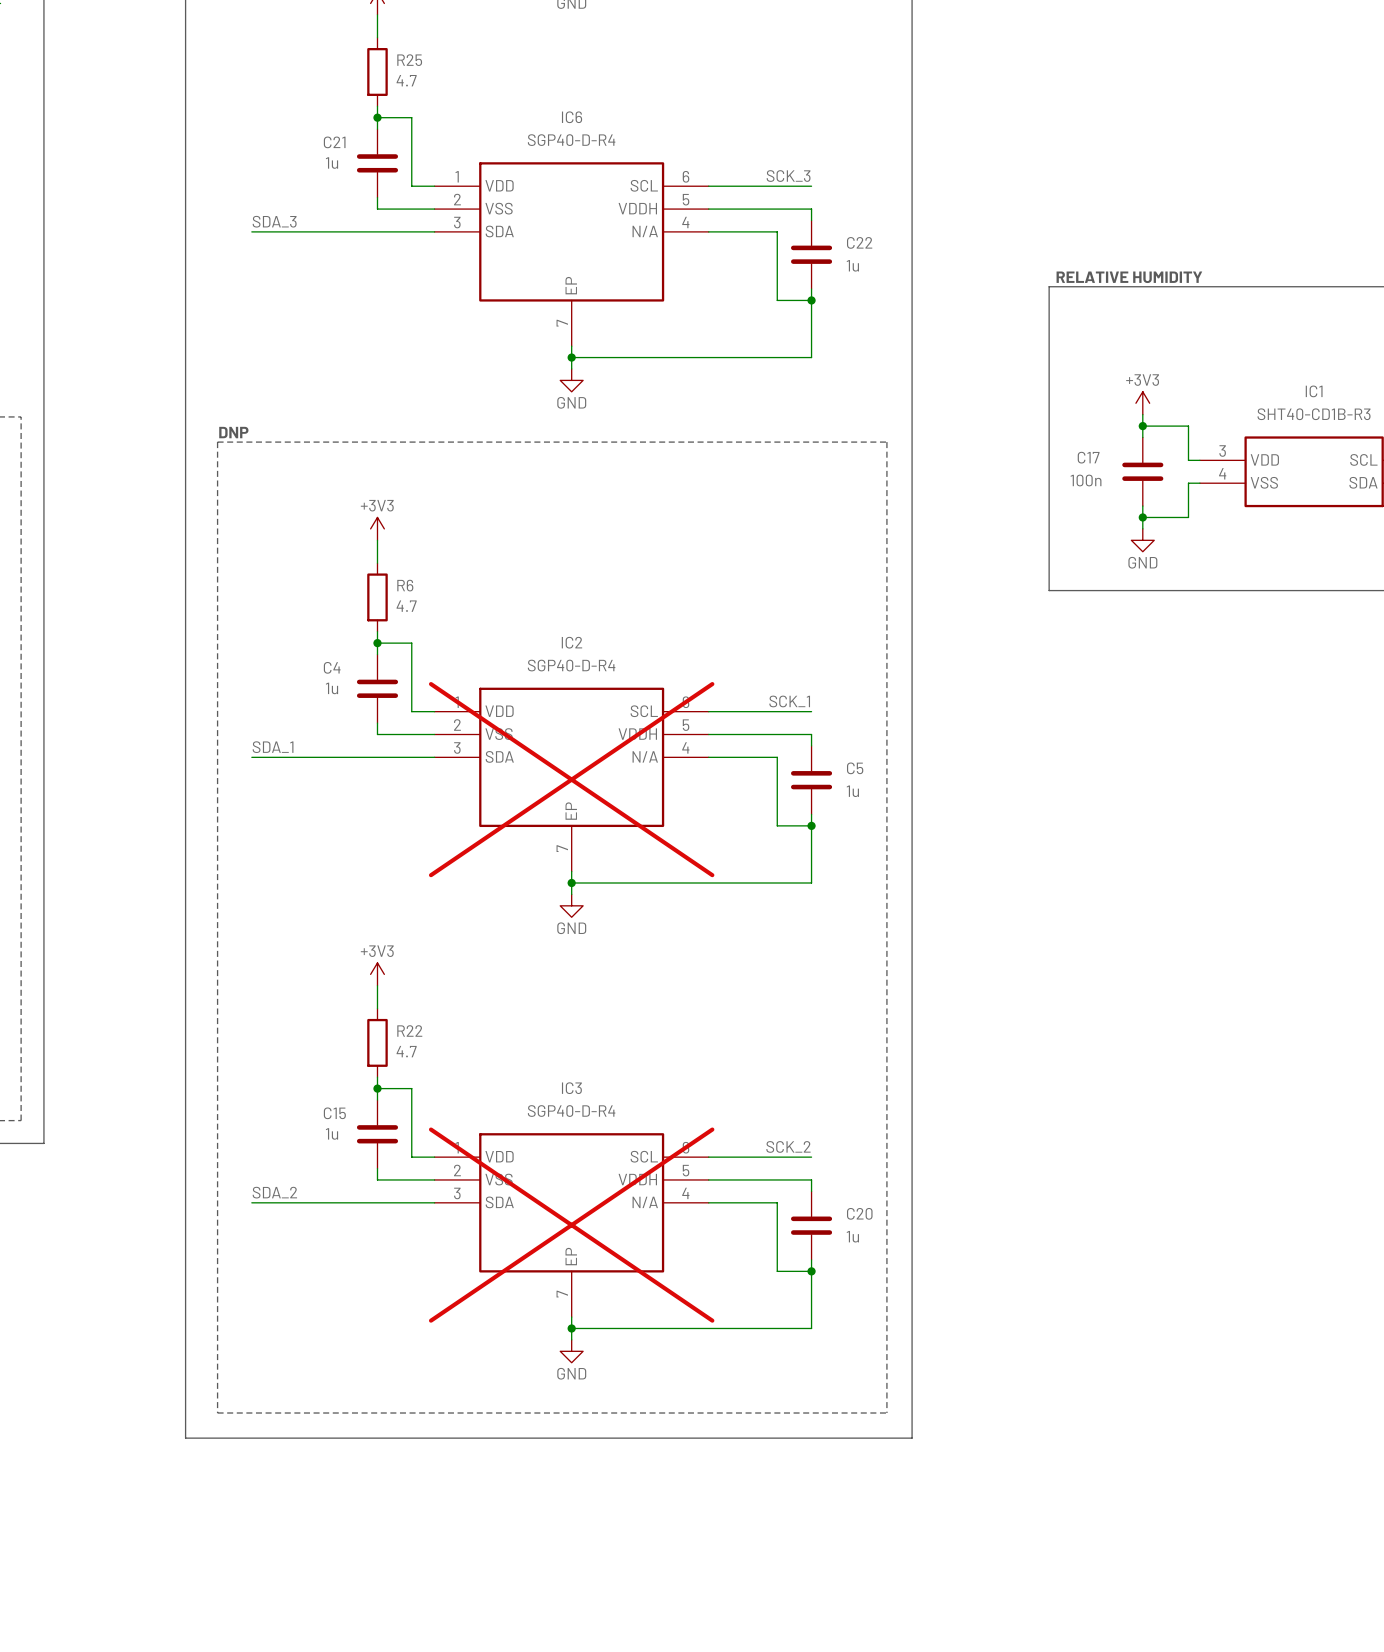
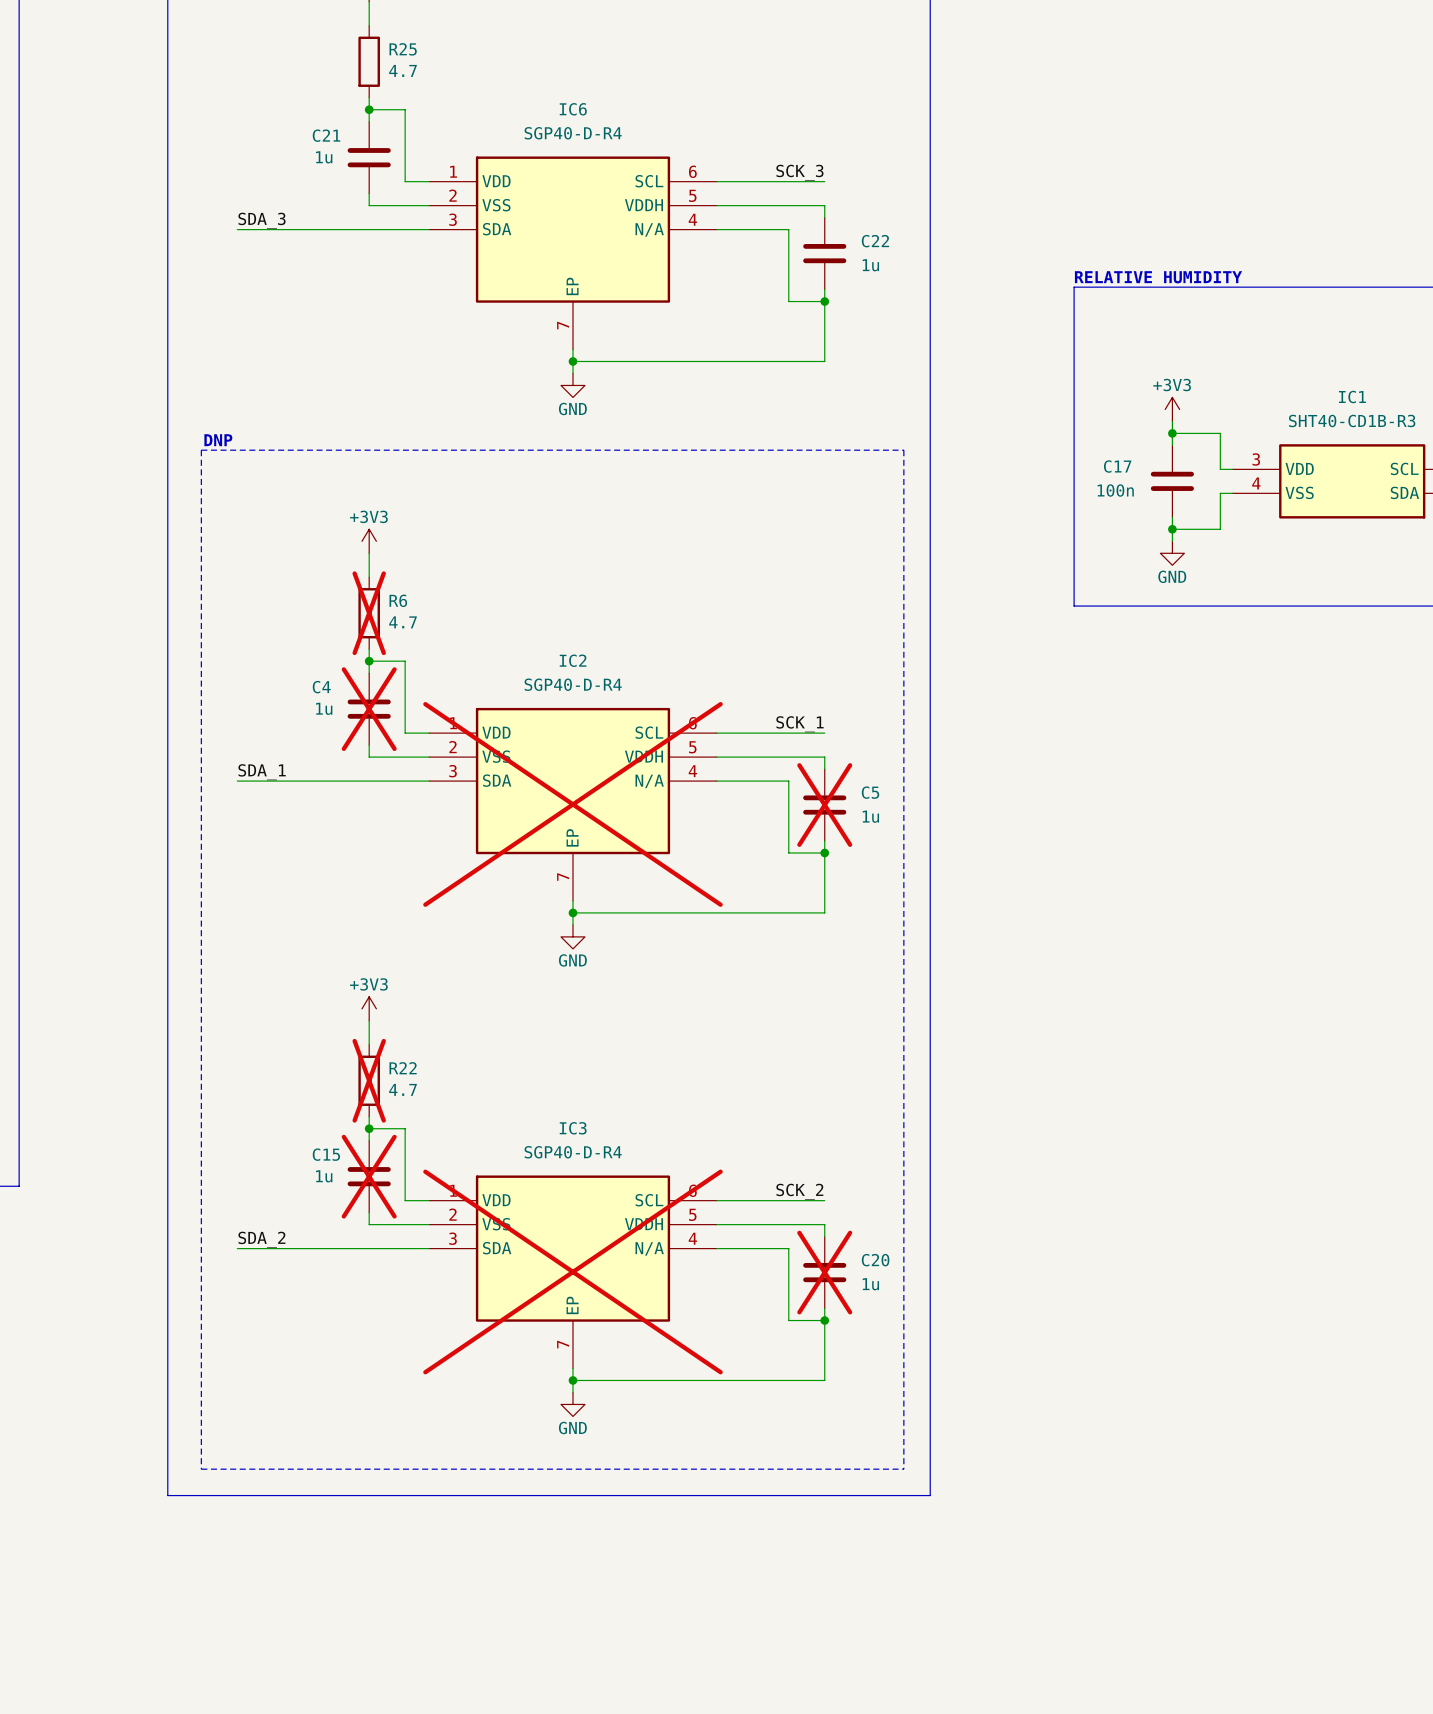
R6 do-not-place cross: none -> (369, 613)
C4 do-not-place cross: none -> (369, 709)
C5 do-not-place cross: none -> (824, 805)
R22 do-not-place cross: none -> (369, 1080)
C15 do-not-place cross: none -> (369, 1176)
C20 do-not-place cross: none -> (824, 1272)

